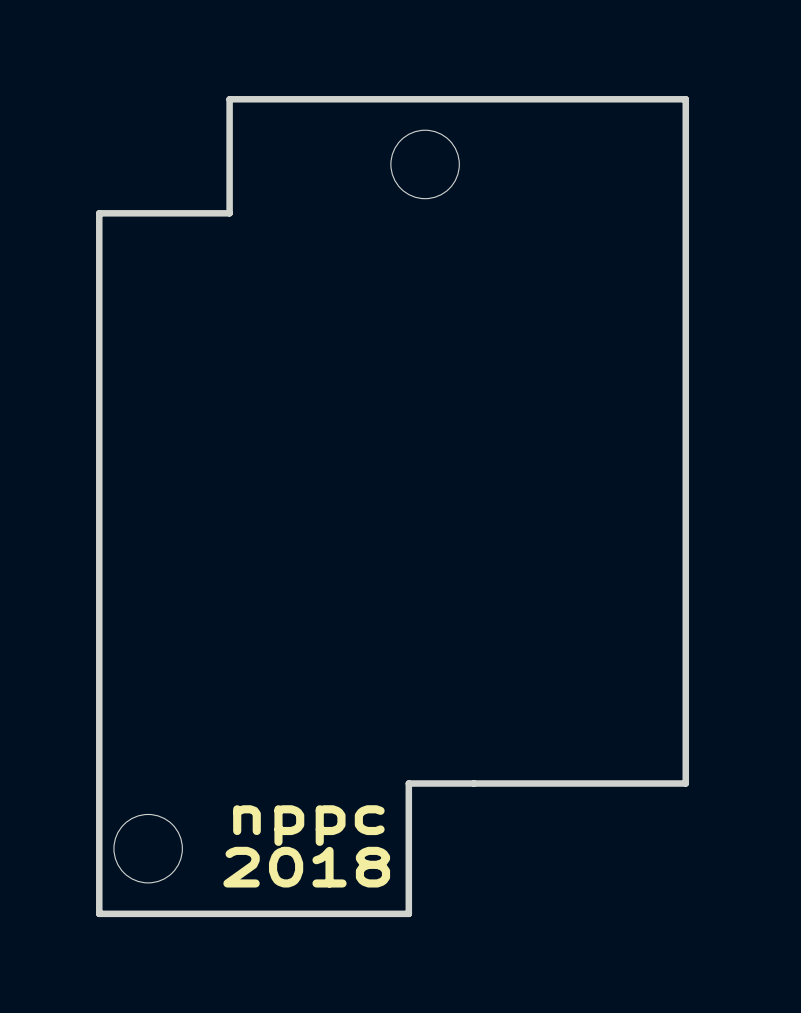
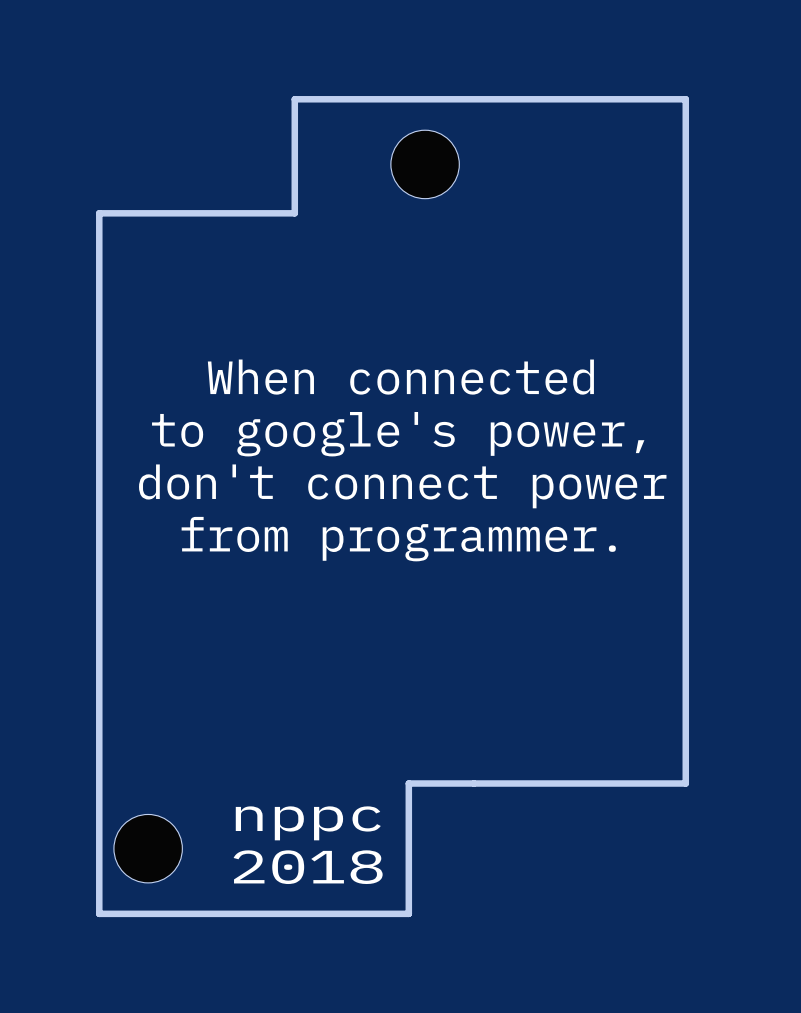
board edge: (294, 99) (229, 99) (229, 213) -> (294, 99) (294, 213) (229, 213)
text: none -> When connected (400, 377)
text: none -> to google's power, (398, 434)
text: none -> don't connect power (402, 486)
text: none -> from programmer. (398, 539)

